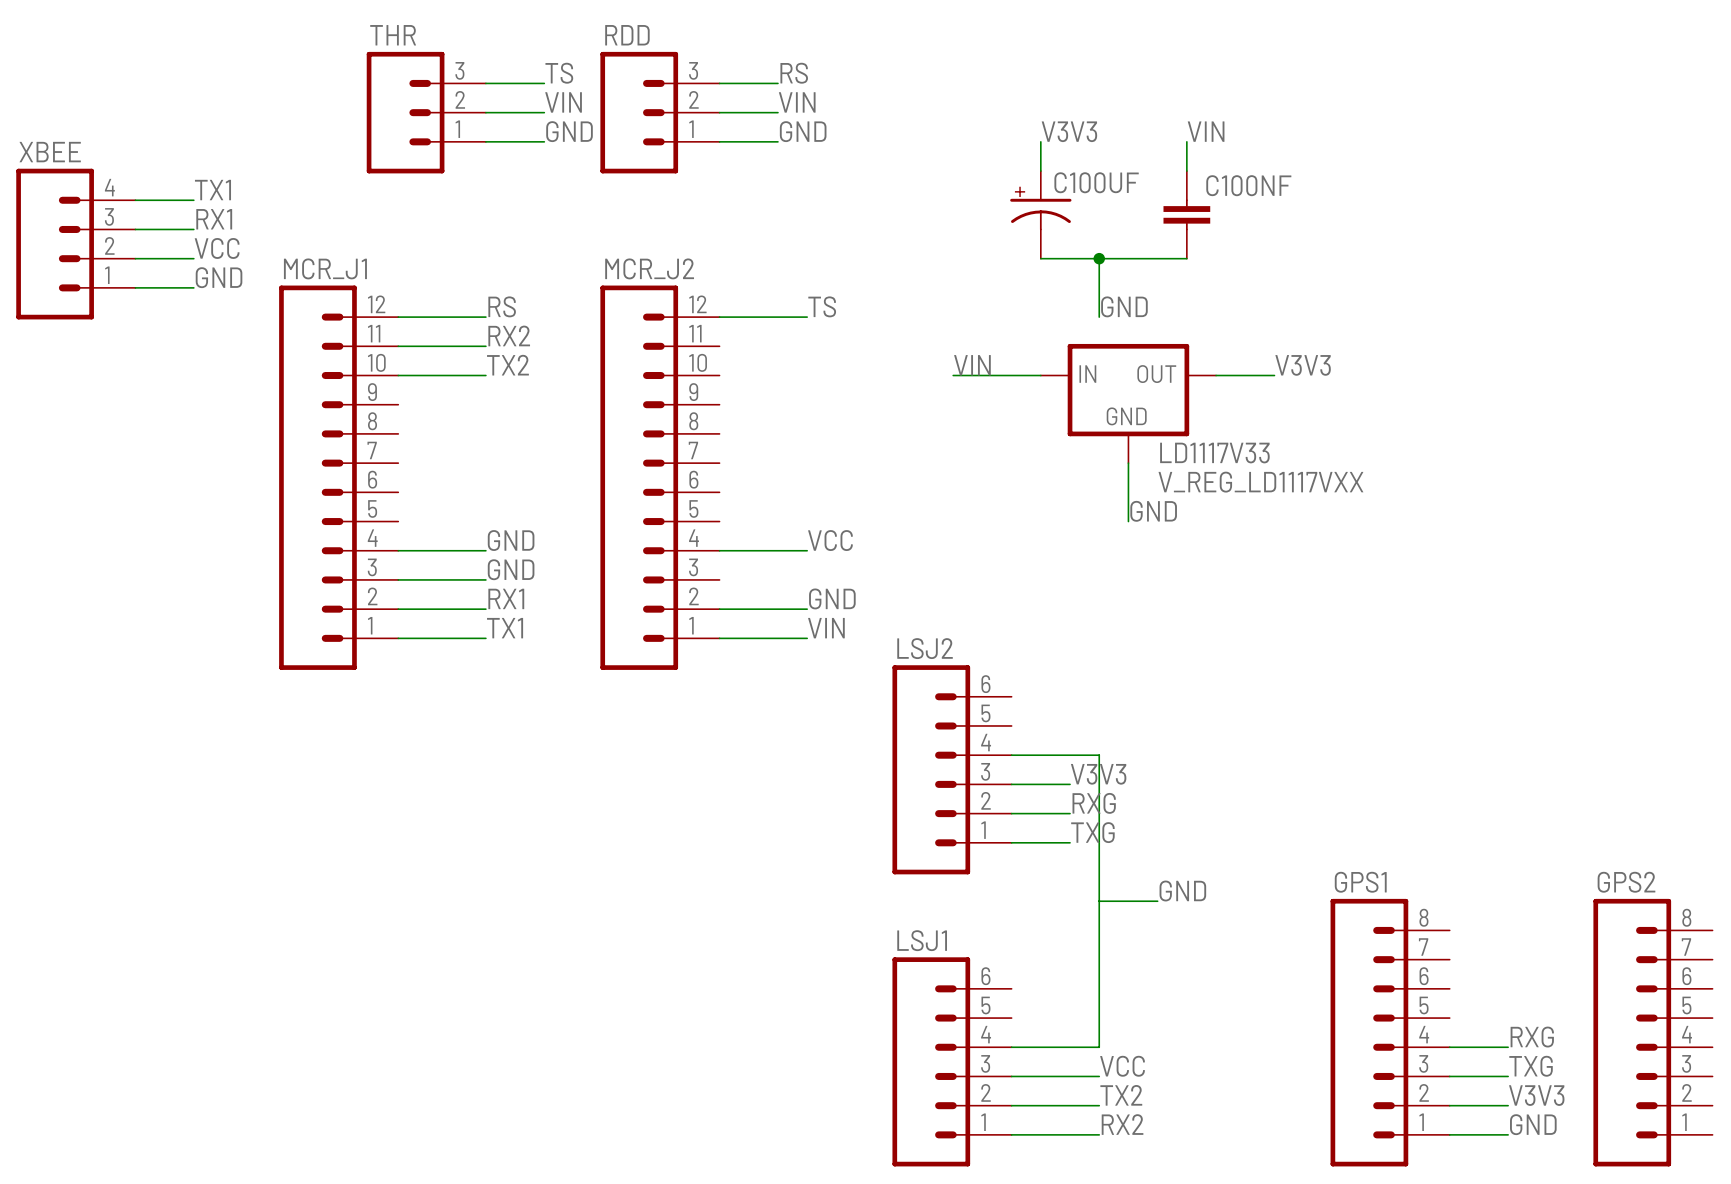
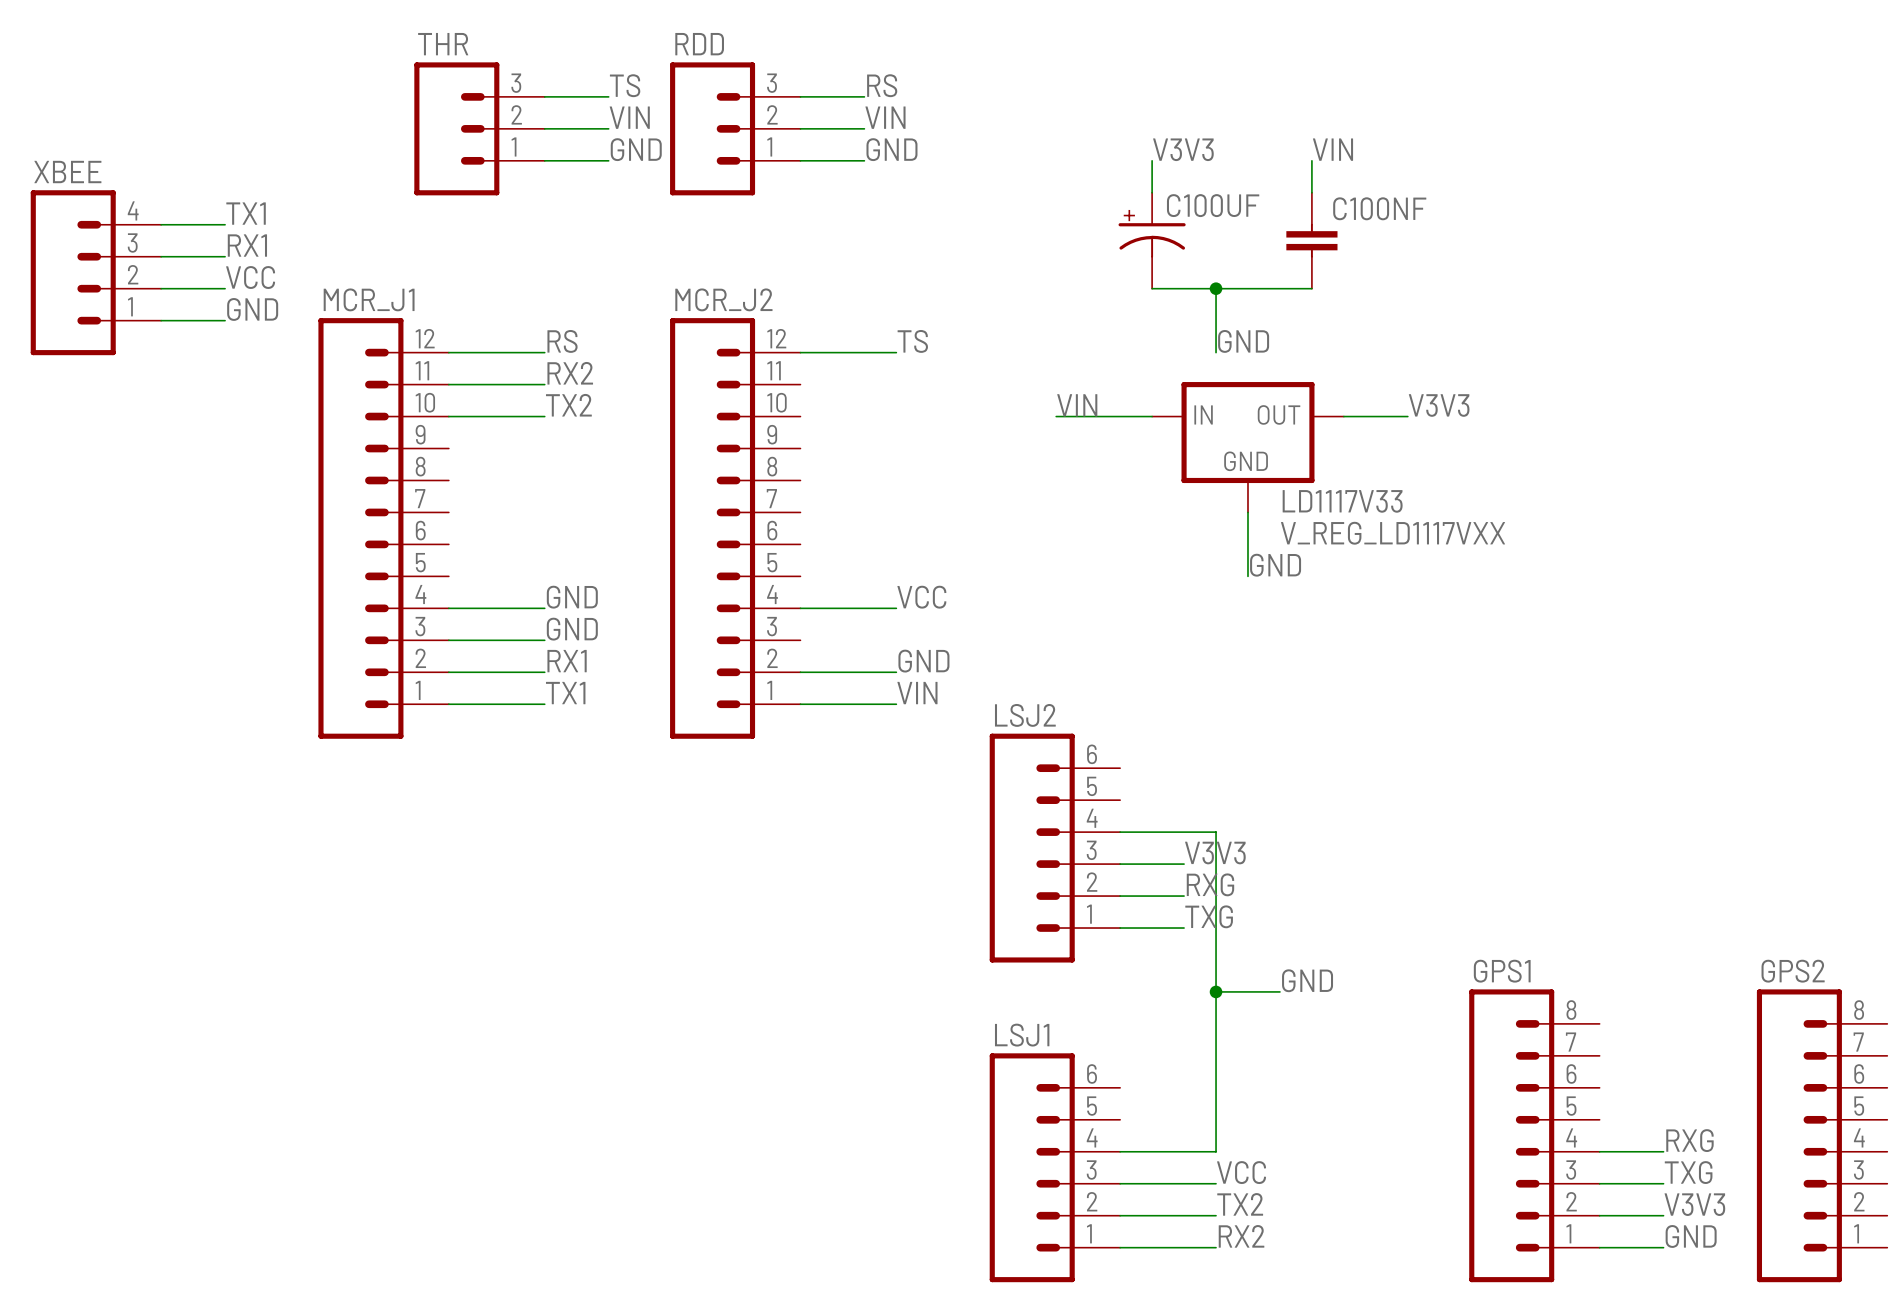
junction: none -> (1216, 991)

